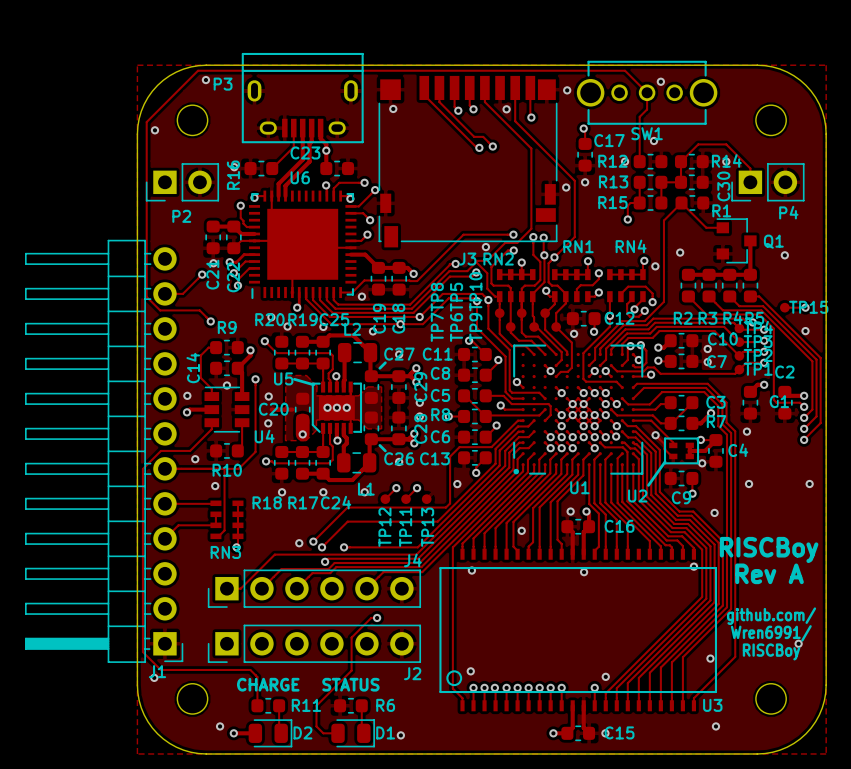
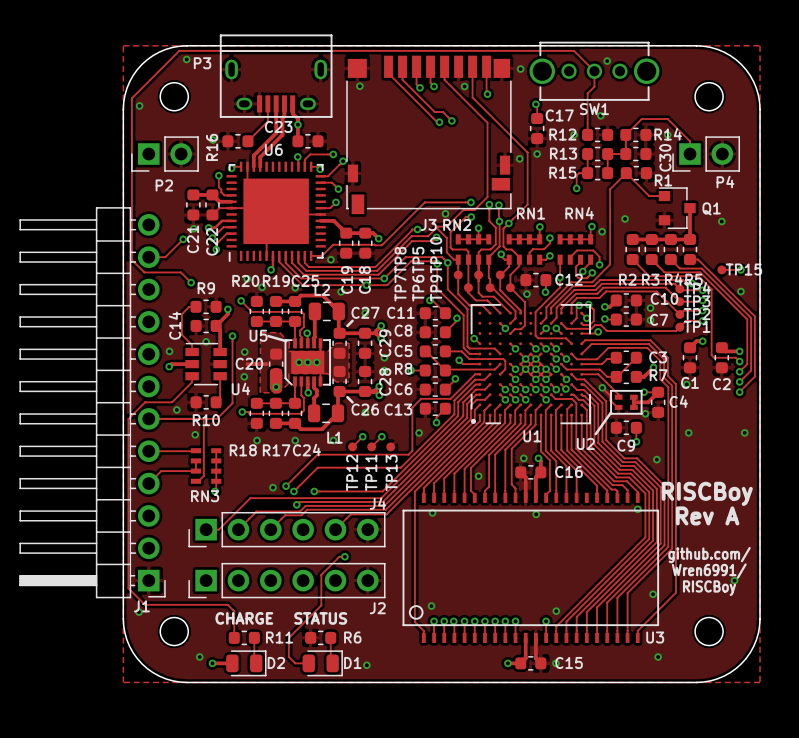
C2 name position: C2 (784, 372) -> C2 (721, 384)
C1 name position: C1 (779, 401) -> C1 (689, 382)

